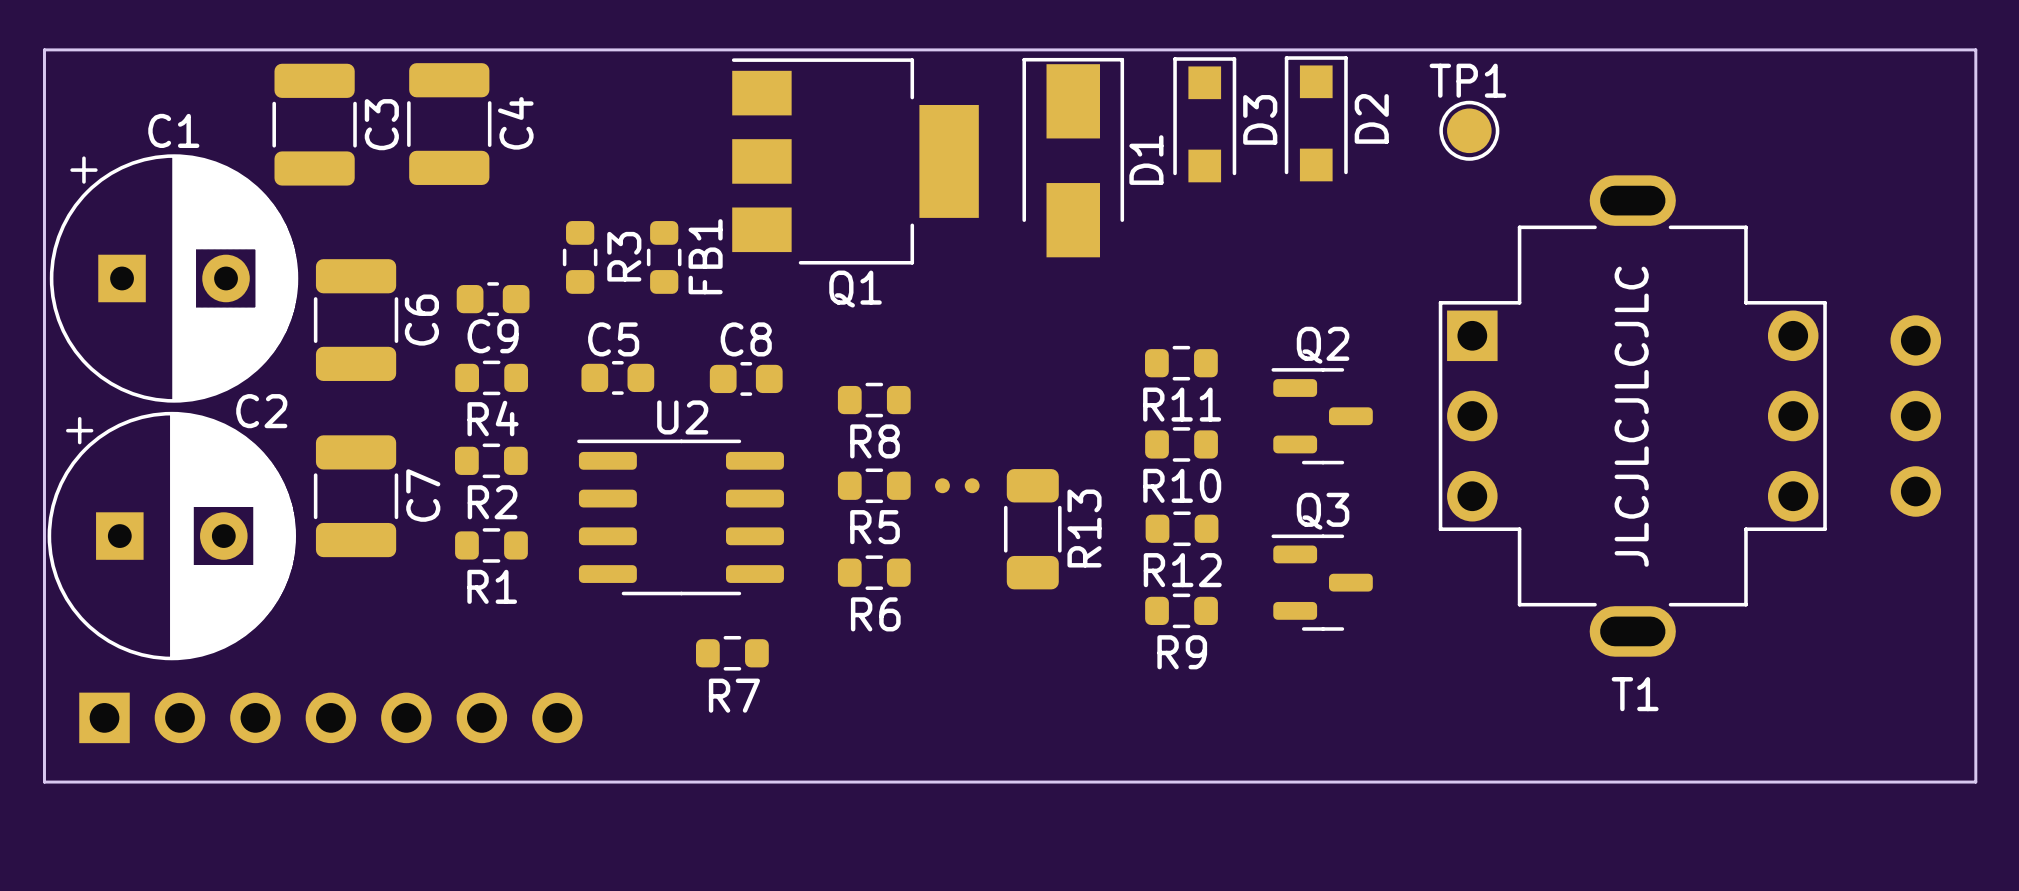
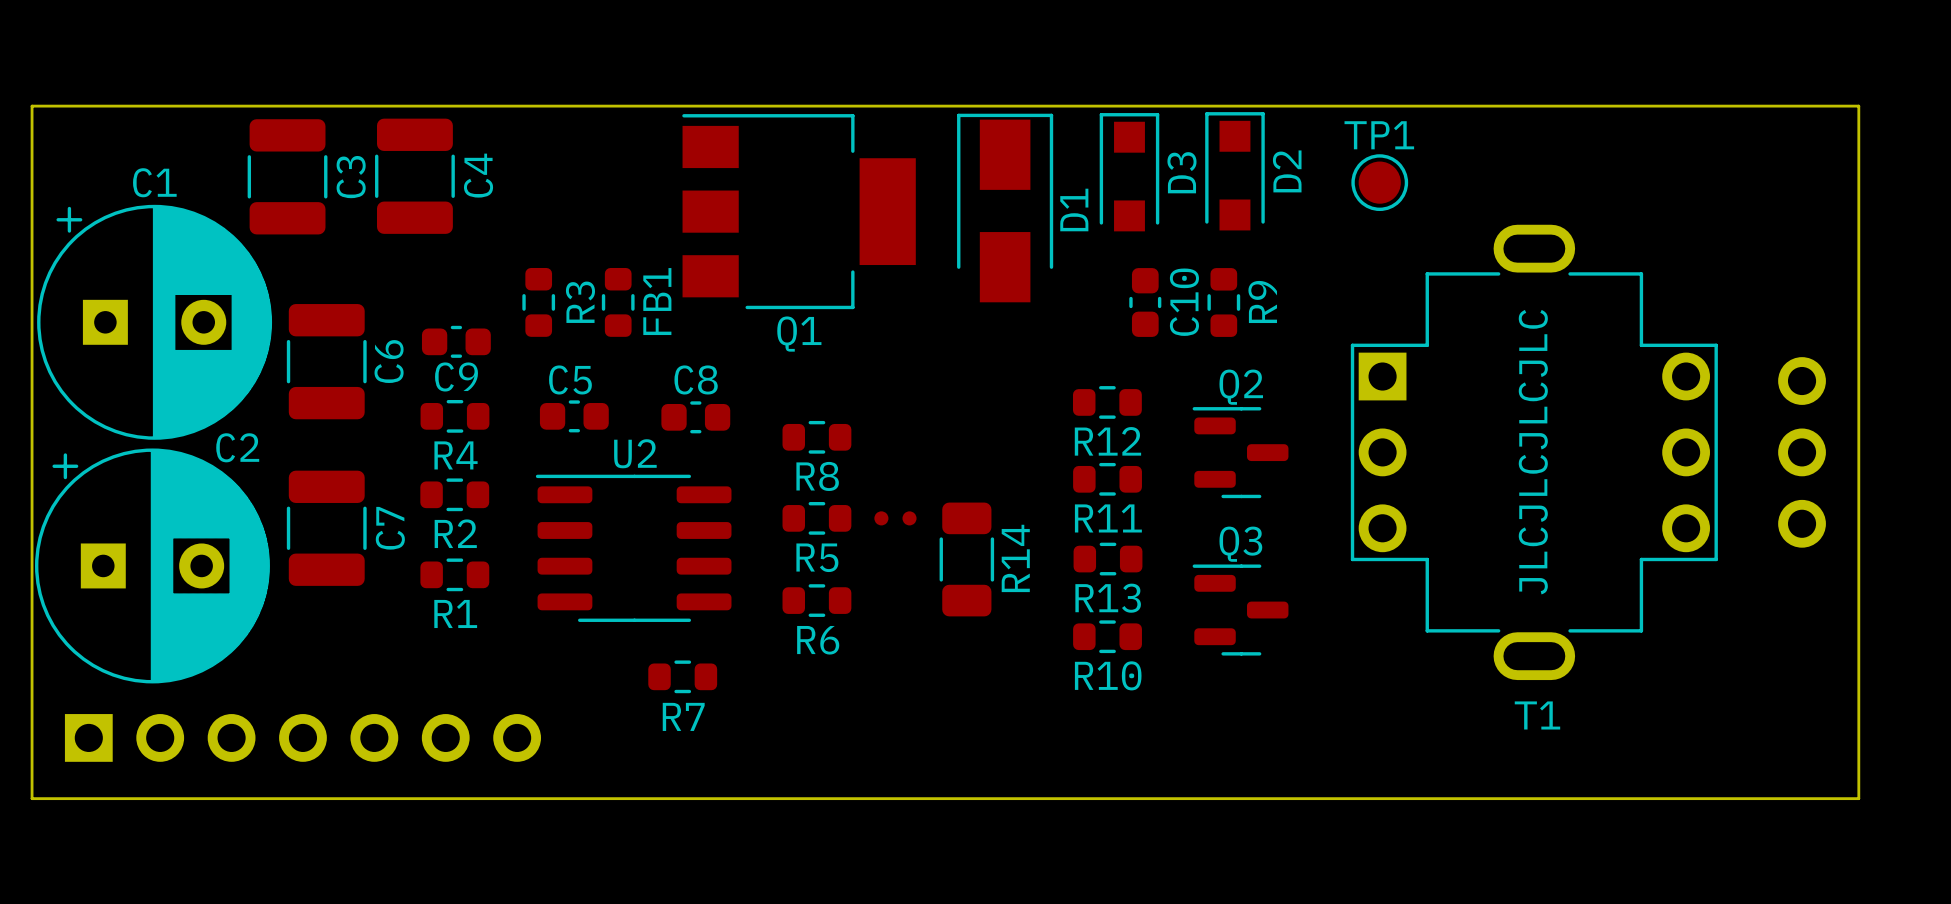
C10: none -> (1145, 302)
R9: none -> (1223, 302)
R11 name: R11 (1182, 404) -> R12 (1107, 441)
R10 name: R10 (1182, 485) -> R11 (1108, 518)
R13 name: R13 (1084, 528) -> R14 (1015, 558)
R12 name: R12 (1182, 570) -> R13 (1108, 598)
R9 name: R9 (1182, 652) -> R10 (1108, 675)

